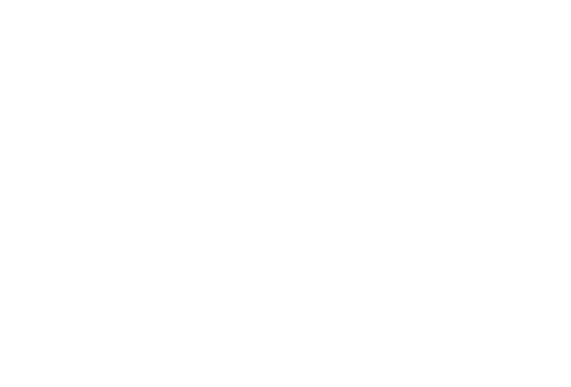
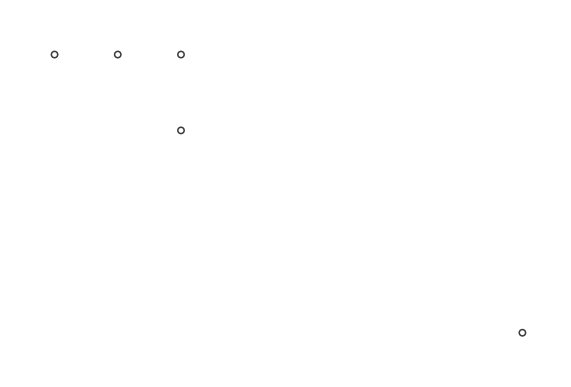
part: none -> (54, 54)
part: none -> (117, 54)
part: none -> (180, 54)
part: none -> (180, 130)
part: none -> (522, 332)

